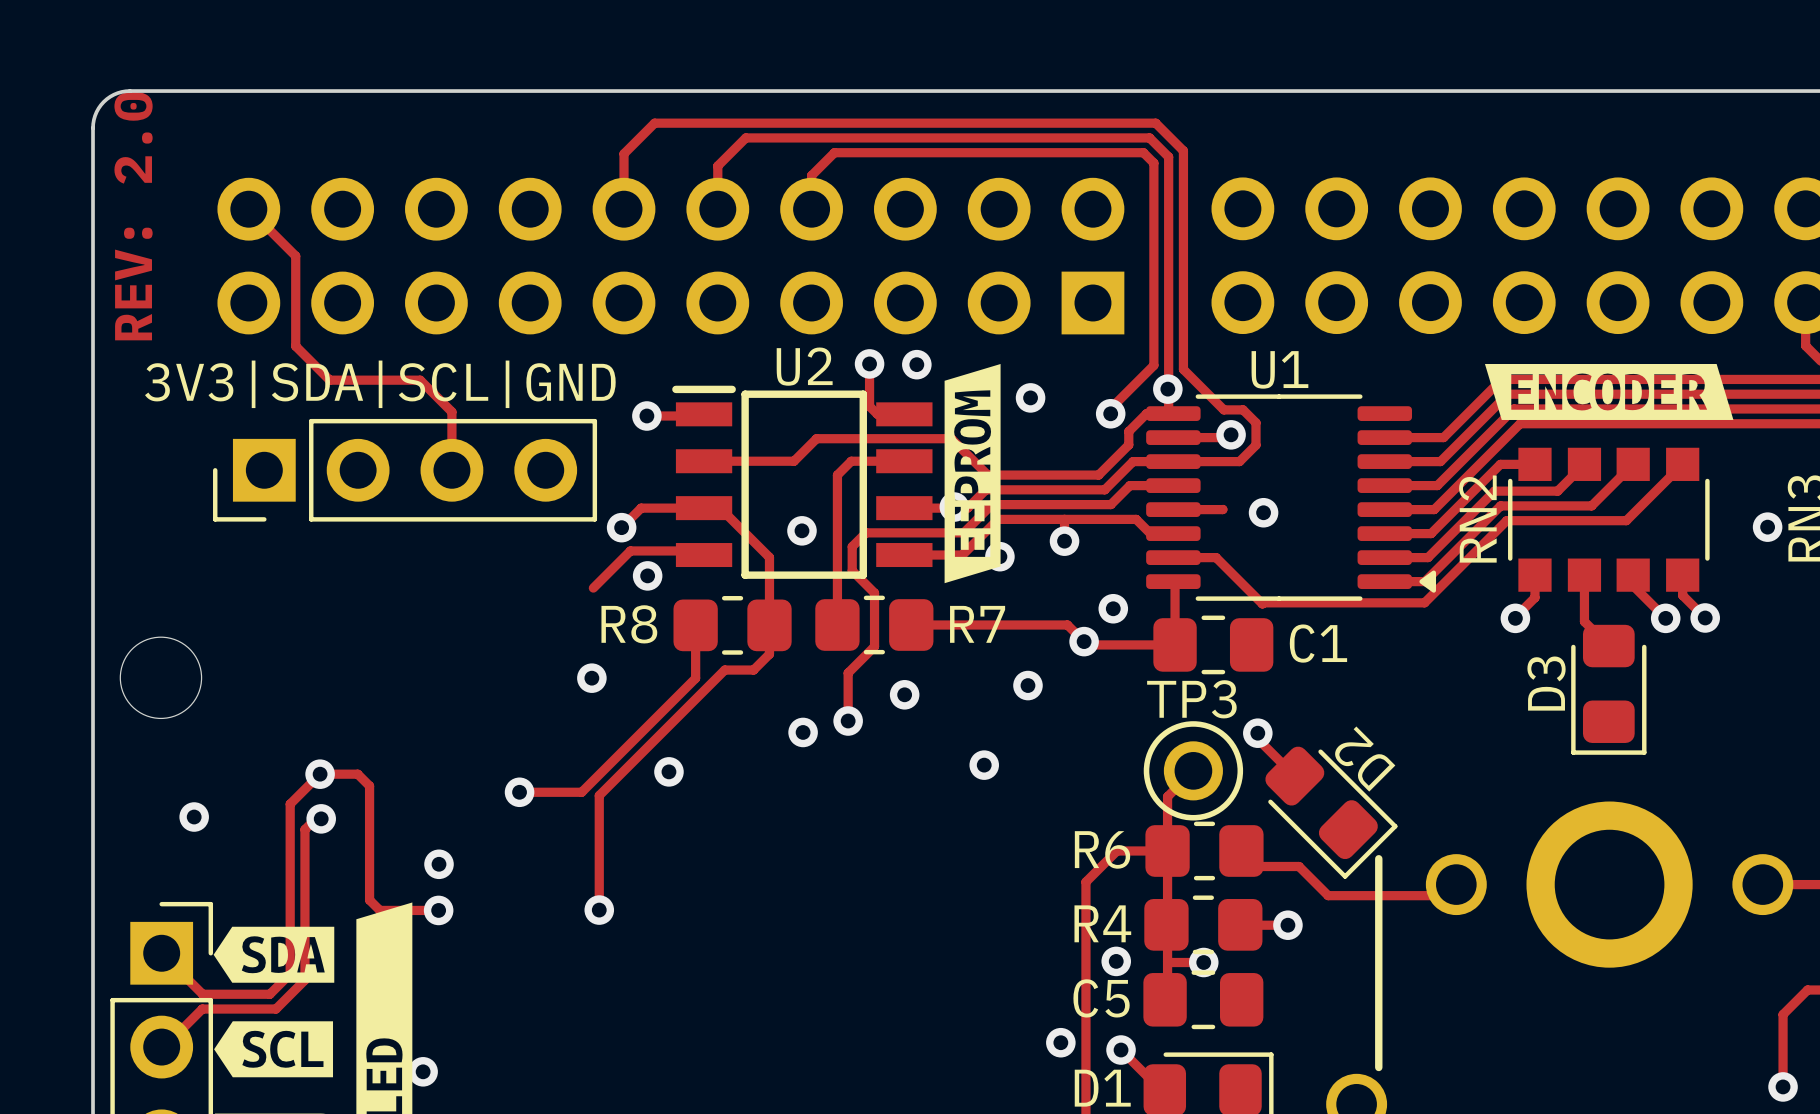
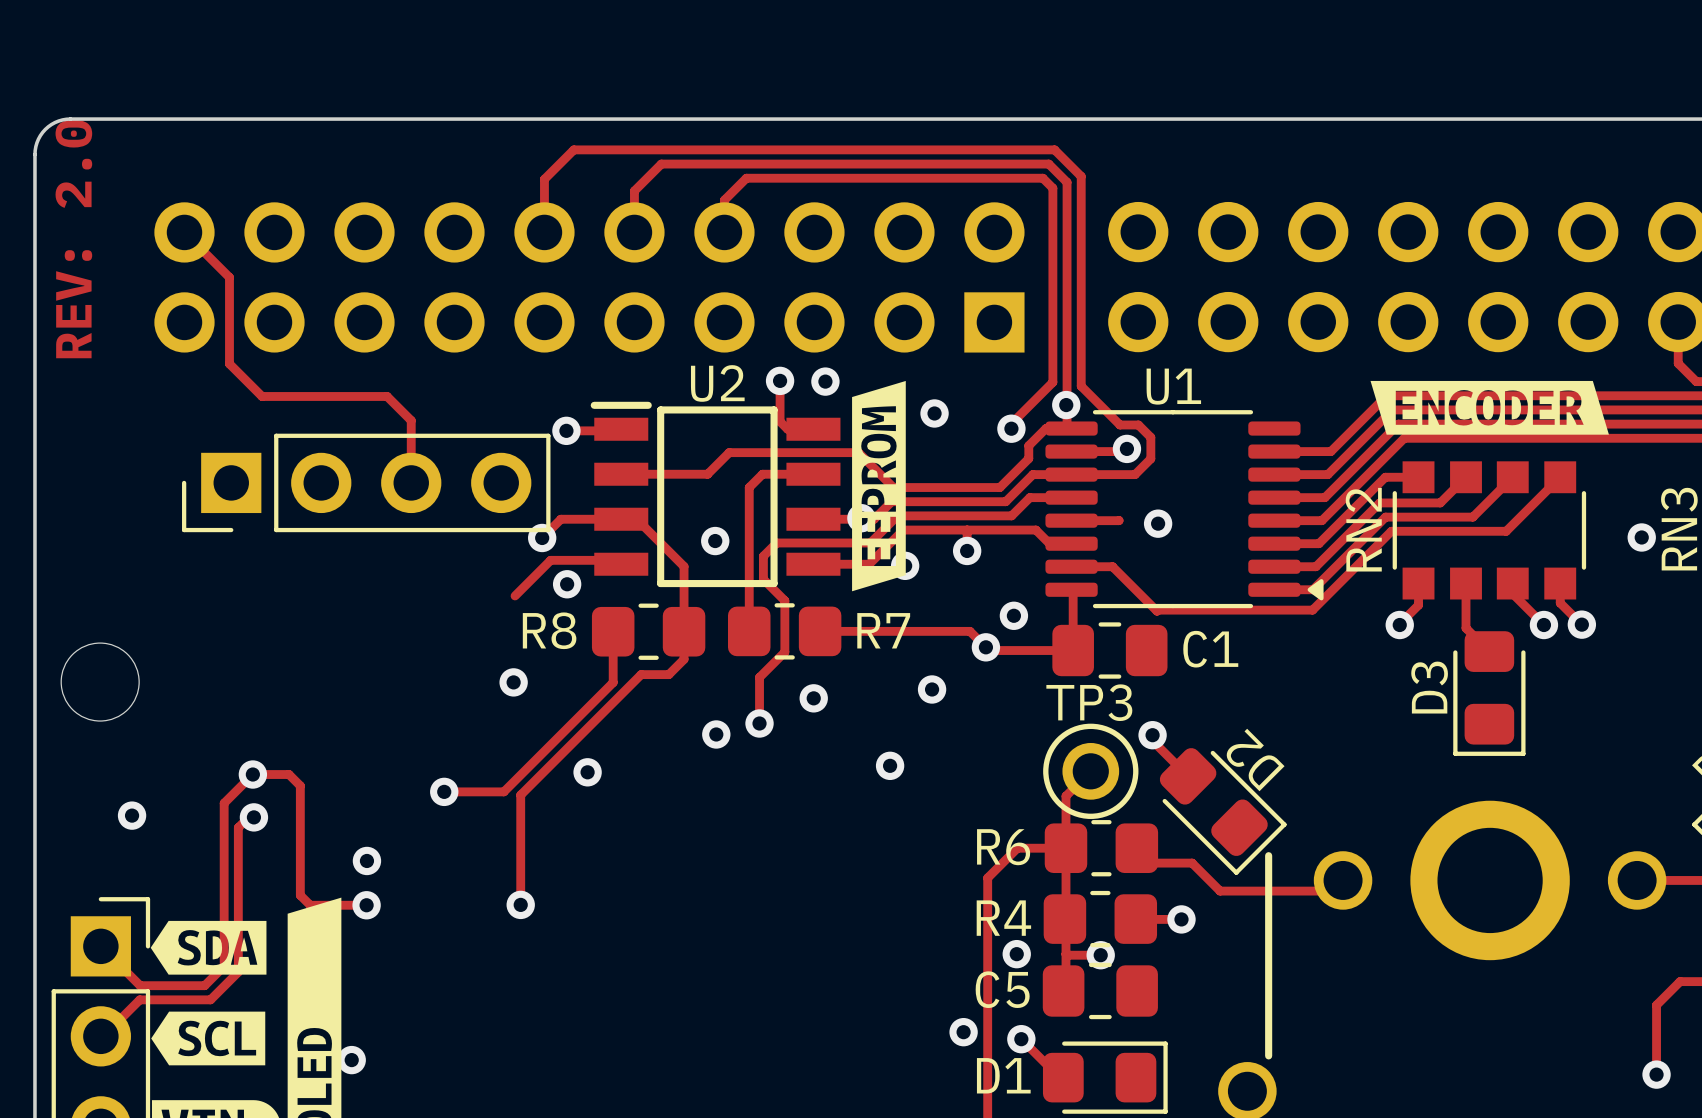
track: (420, 380) (451, 411) (451, 470) -> (348, 396) (387, 396) (411, 420) (411, 482)
text: 3V3|SDA|SCL|GND (380, 384) -> none
part position: (405, 470) -> (366, 482)

